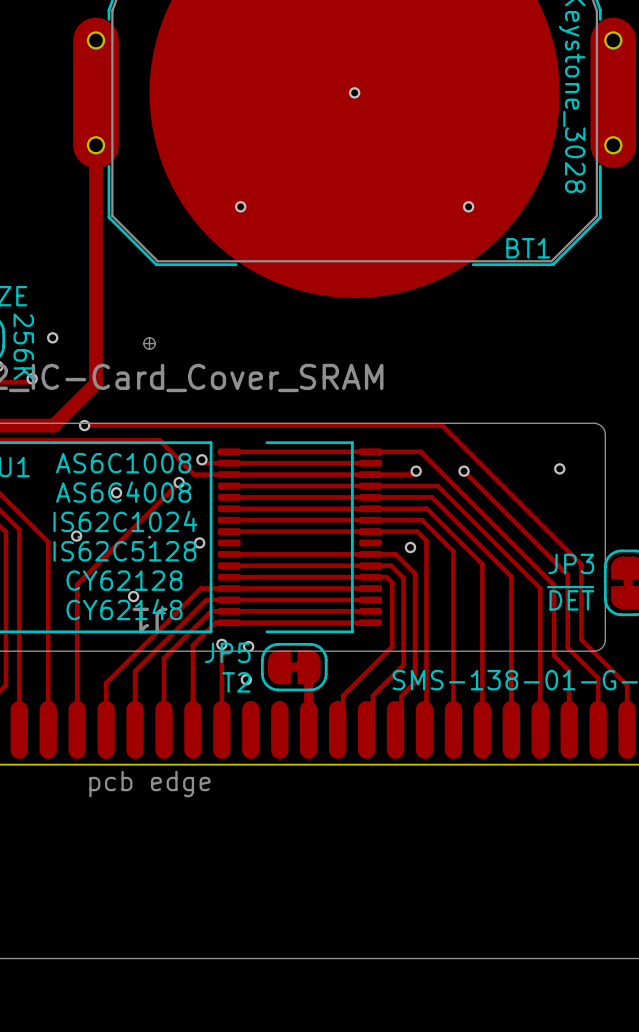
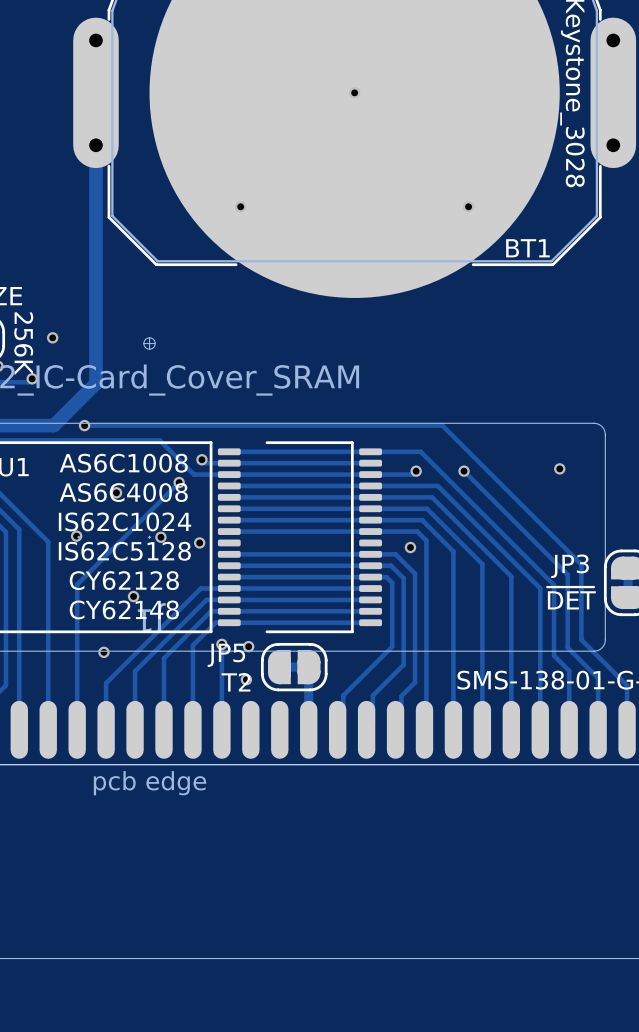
via: none -> (160, 537)
via: none -> (103, 652)

